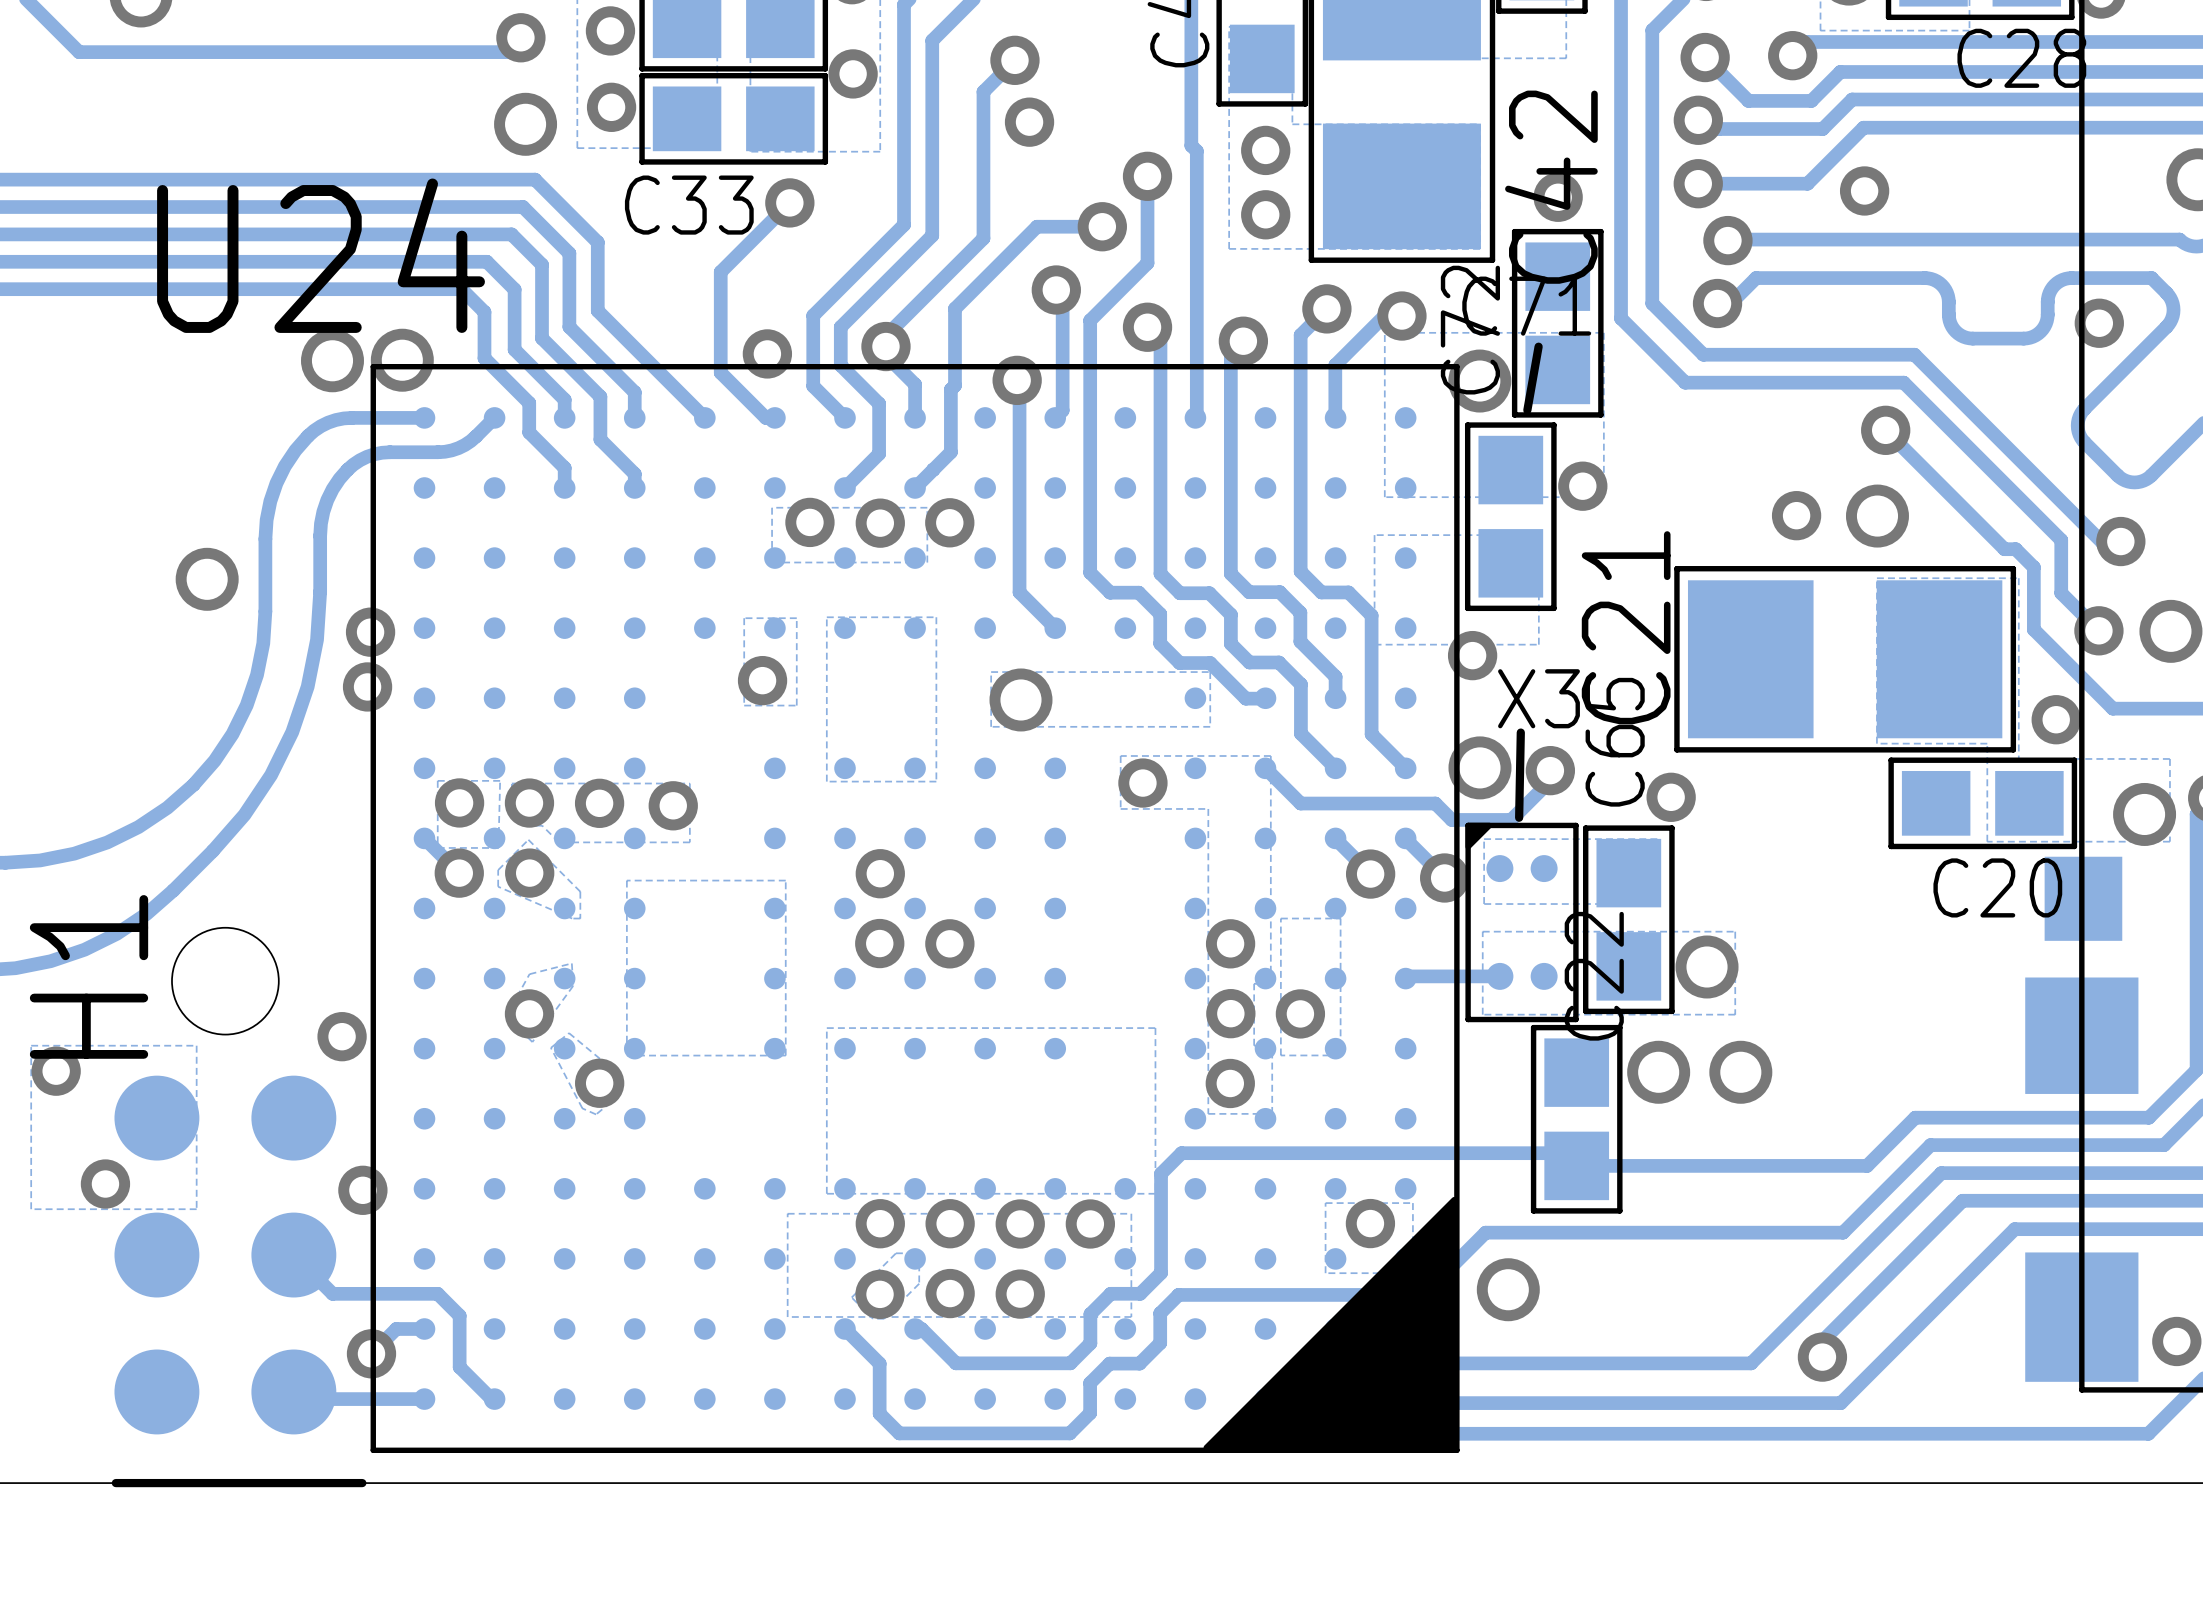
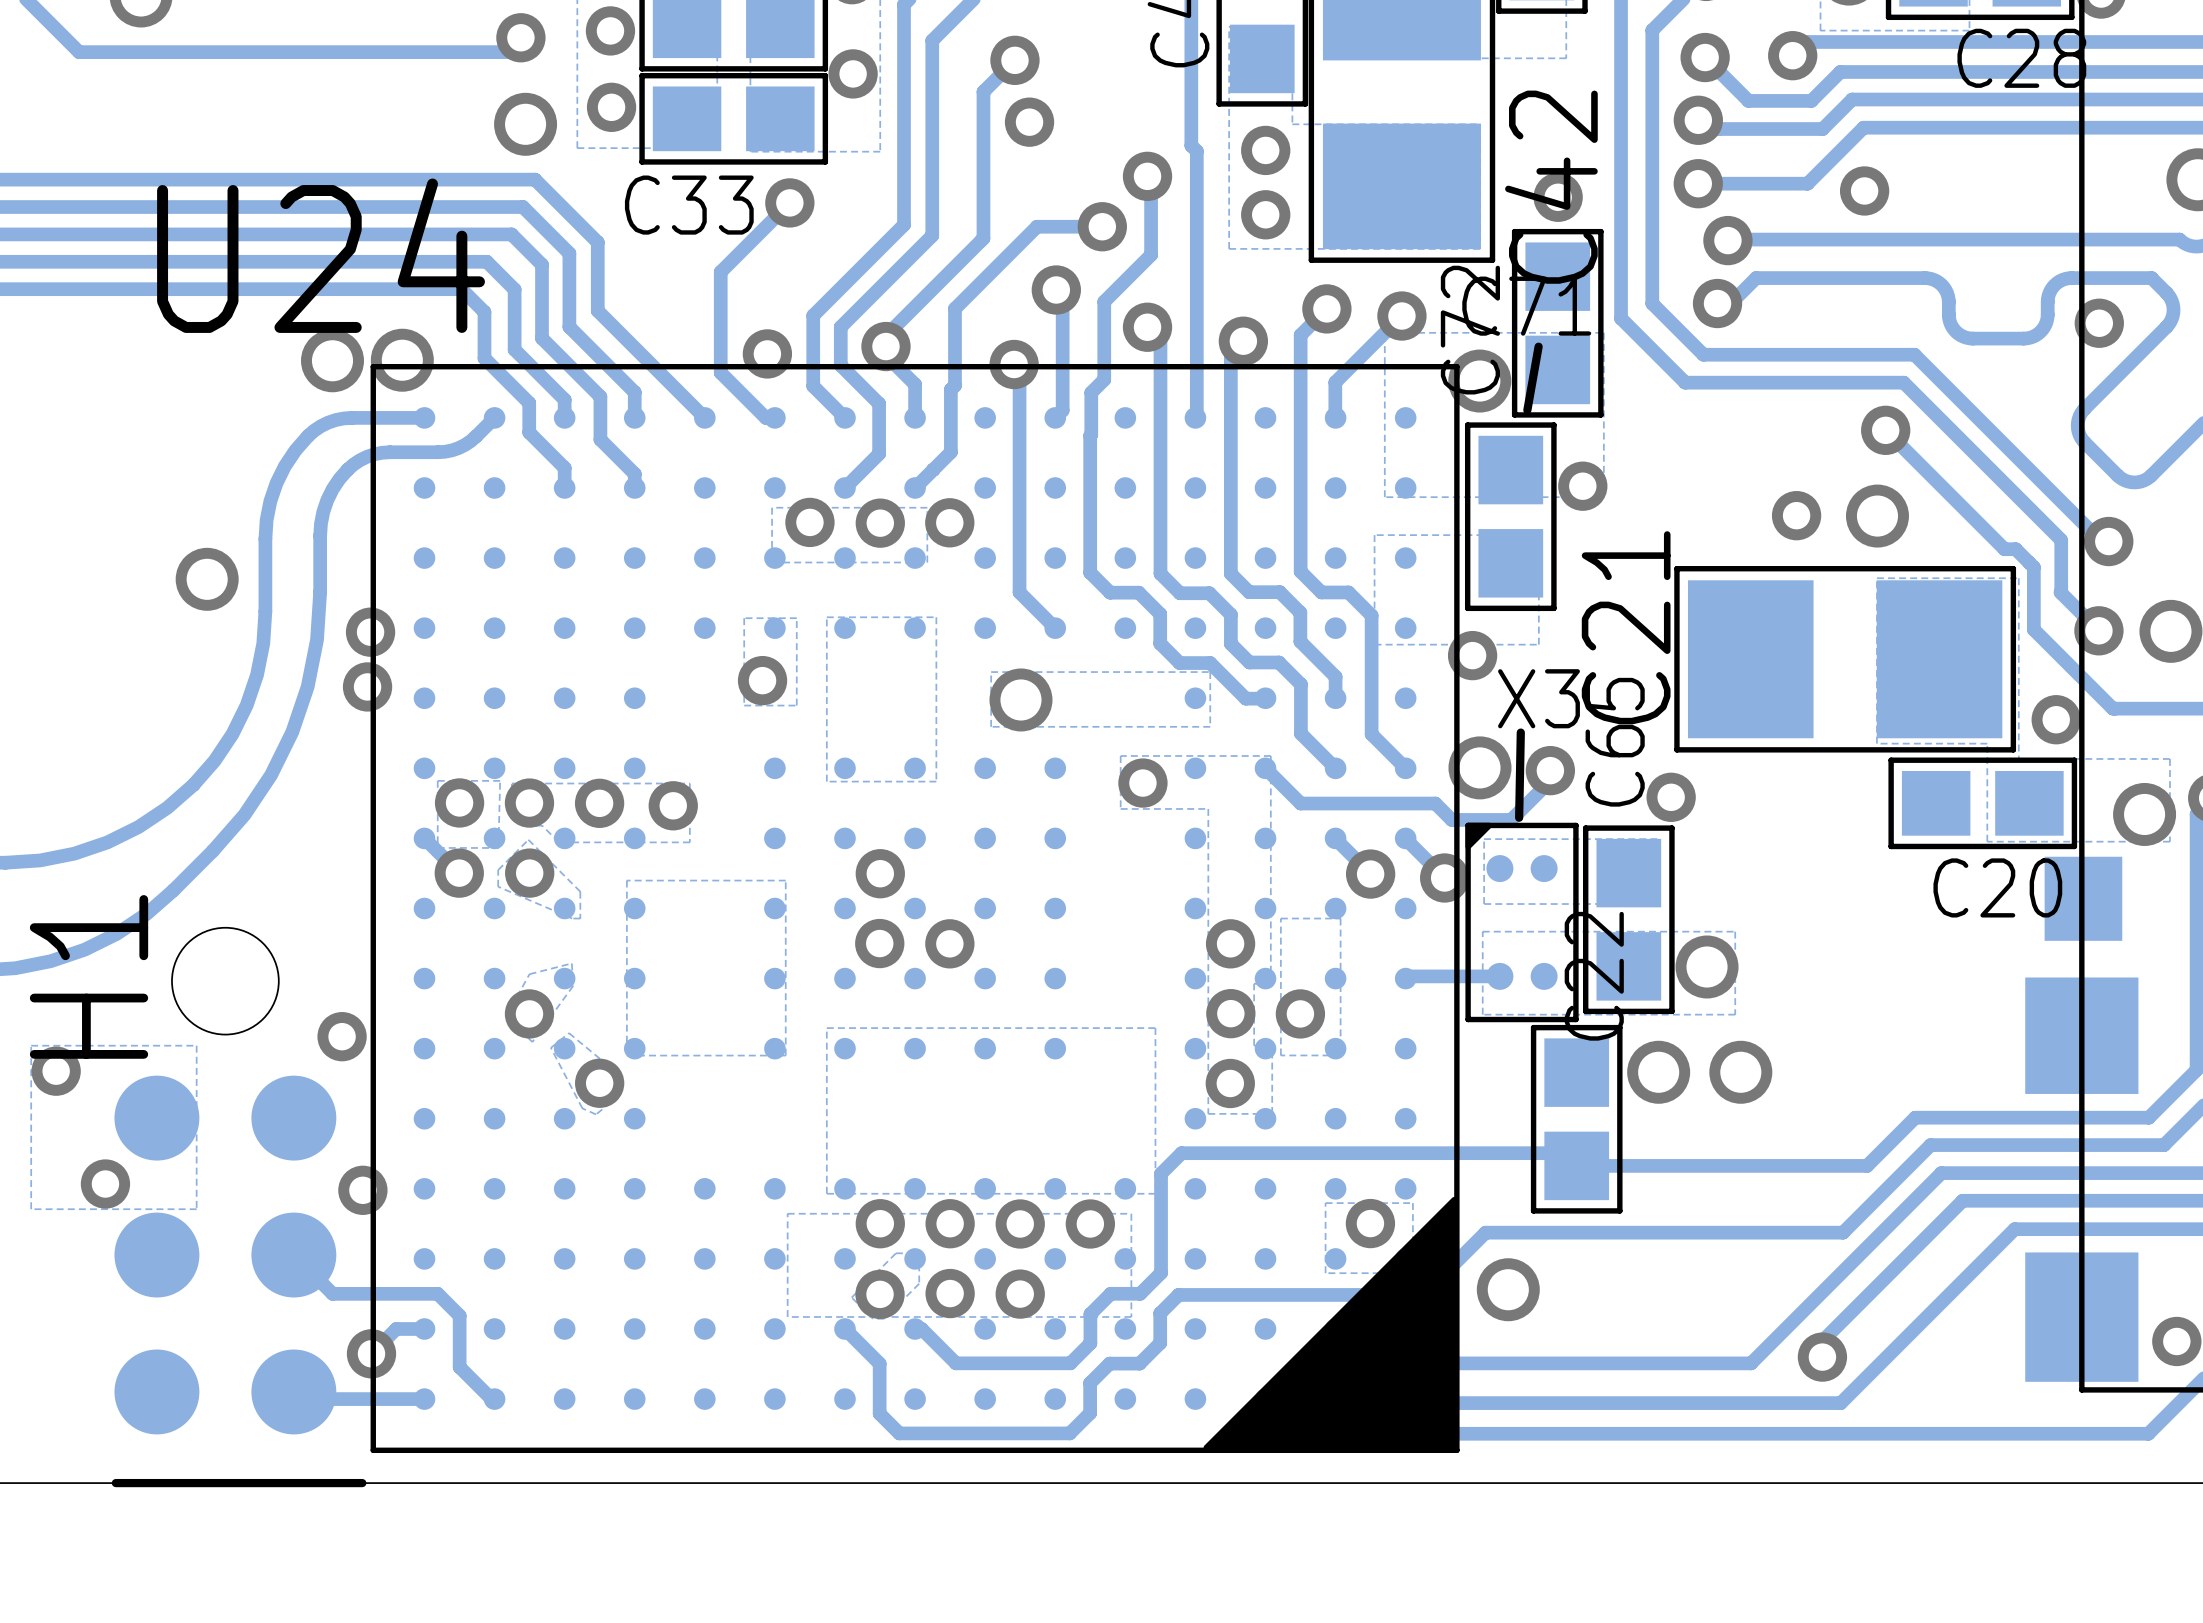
track: (1147, 176) (1147, 263) (1090, 320) (1090, 435) -> (1147, 176) (1151, 179) (1151, 254) (1104, 301) (1104, 379) (1091, 392) (1091, 434)
track: (1401, 316) (1384, 316) (1335, 365) (1335, 382) -> (1405, 308) (1405, 311) (1335, 382)
via position: (1017, 380) -> (1014, 364)
via position: (2120, 541) -> (2108, 541)

